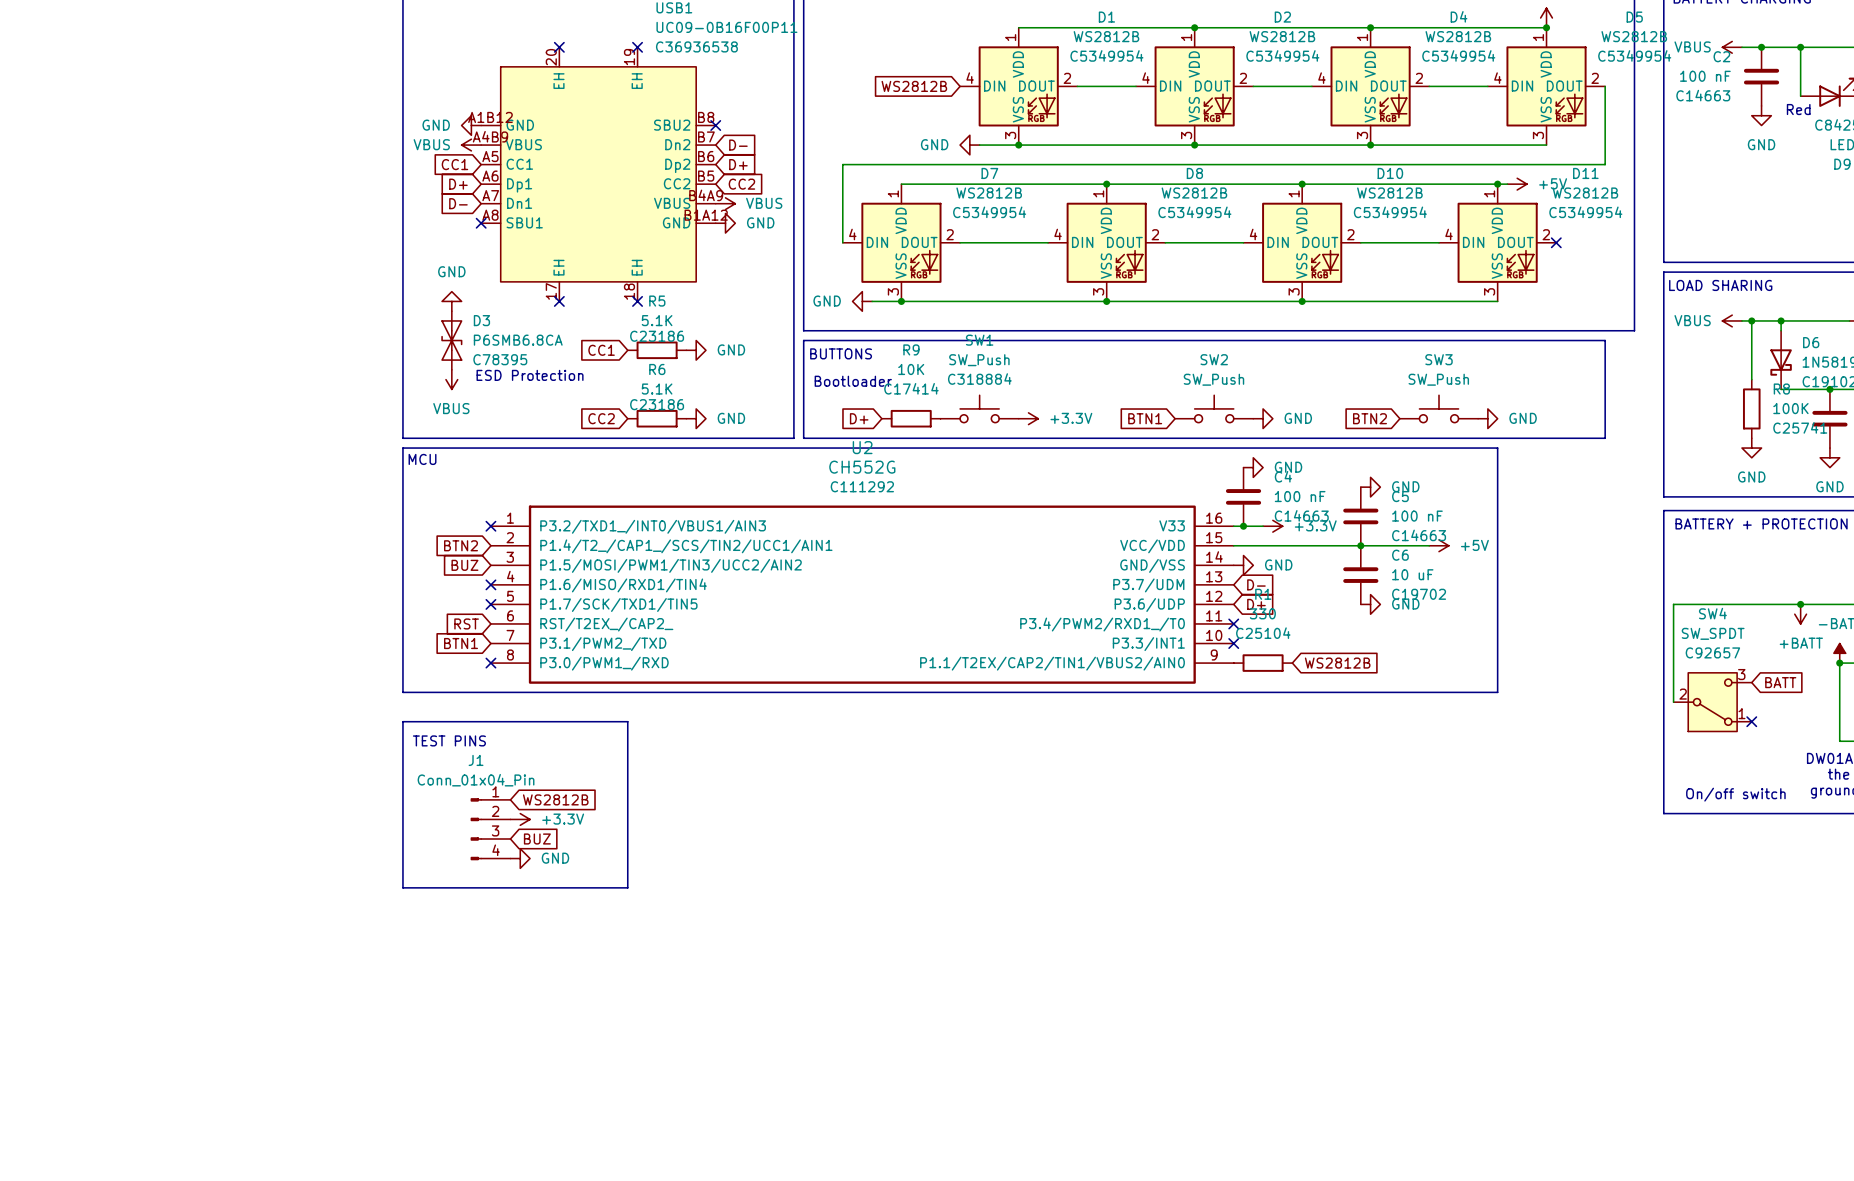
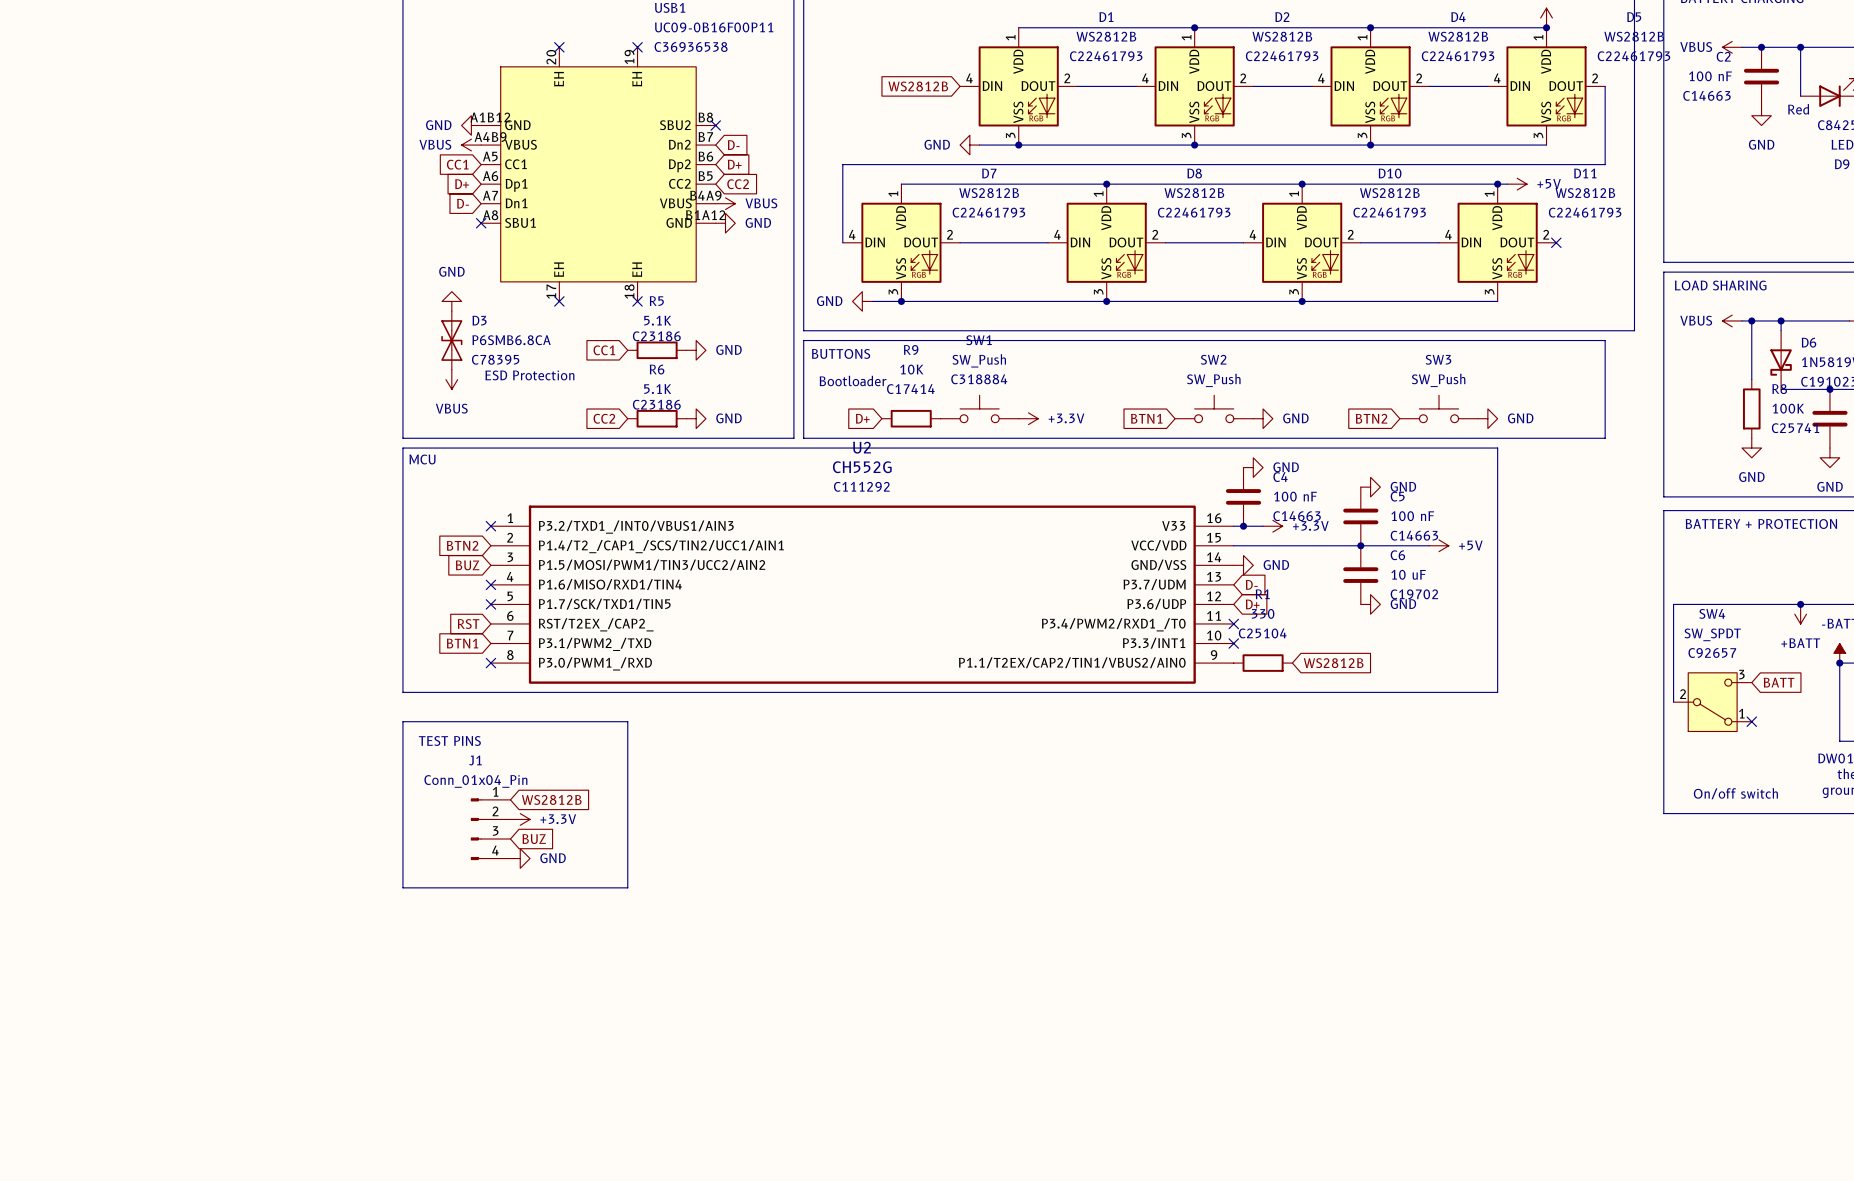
D1 text: C5349954 (1106, 55) -> C22461793 (1106, 56)
D2 text: C5349954 (1282, 55) -> C22461793 (1282, 56)
D4 text: C5349954 (1458, 55) -> C22461793 (1458, 56)
D5 text: C5349954 (1634, 55) -> C22461793 (1633, 56)
D7 text: C5349954 (989, 212) -> C22461793 (988, 212)
D8 text: C5349954 (1194, 212) -> C22461793 (1194, 212)
D10 text: C5349954 (1390, 212) -> C22461793 (1389, 212)
D11 text: C5349954 (1585, 212) -> C22461793 (1585, 212)

